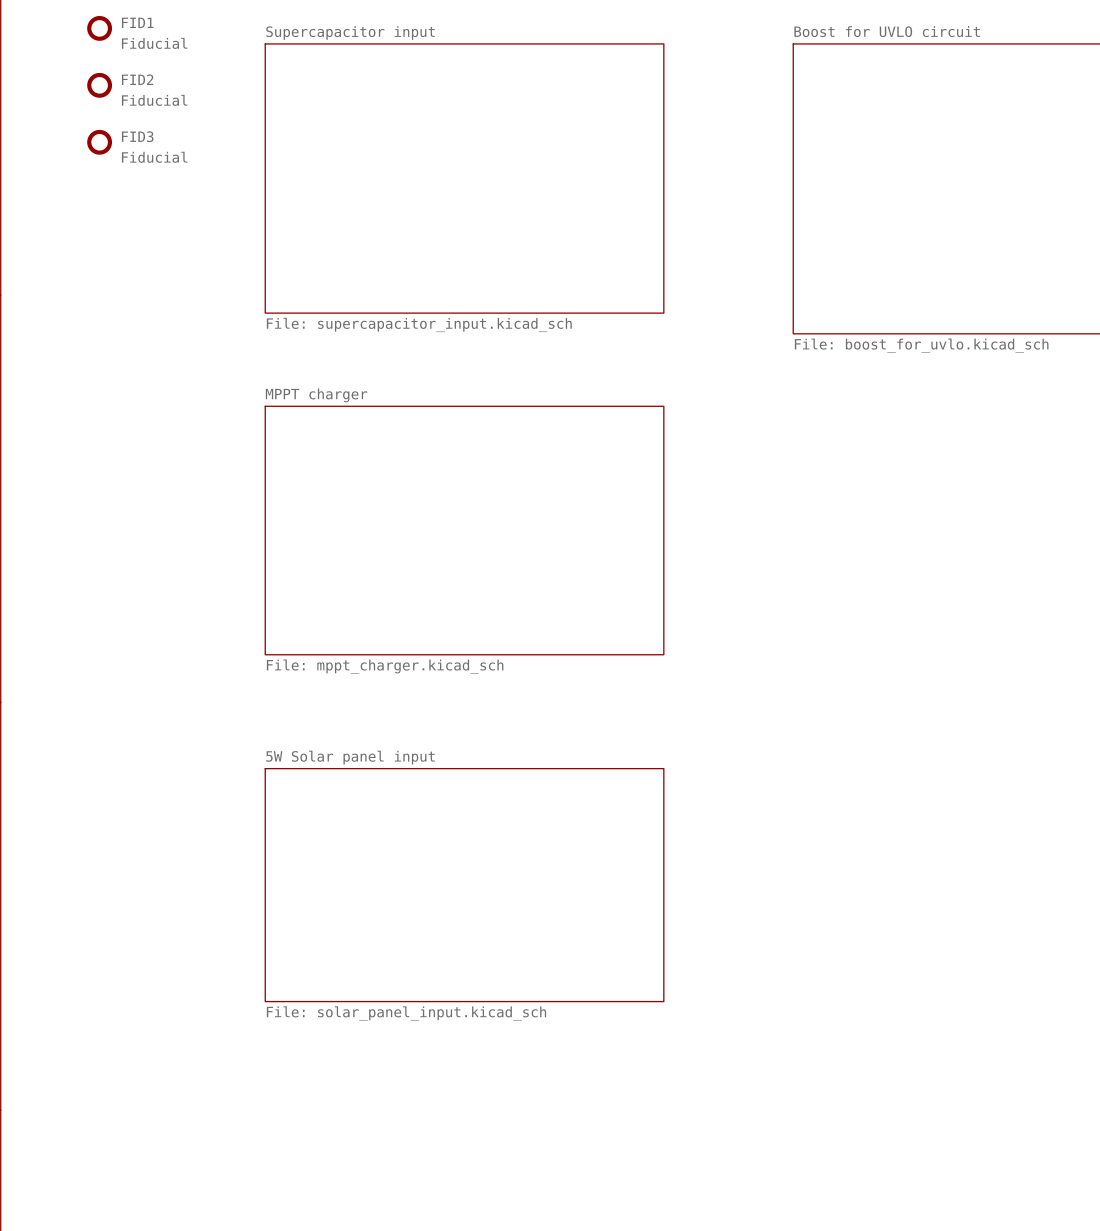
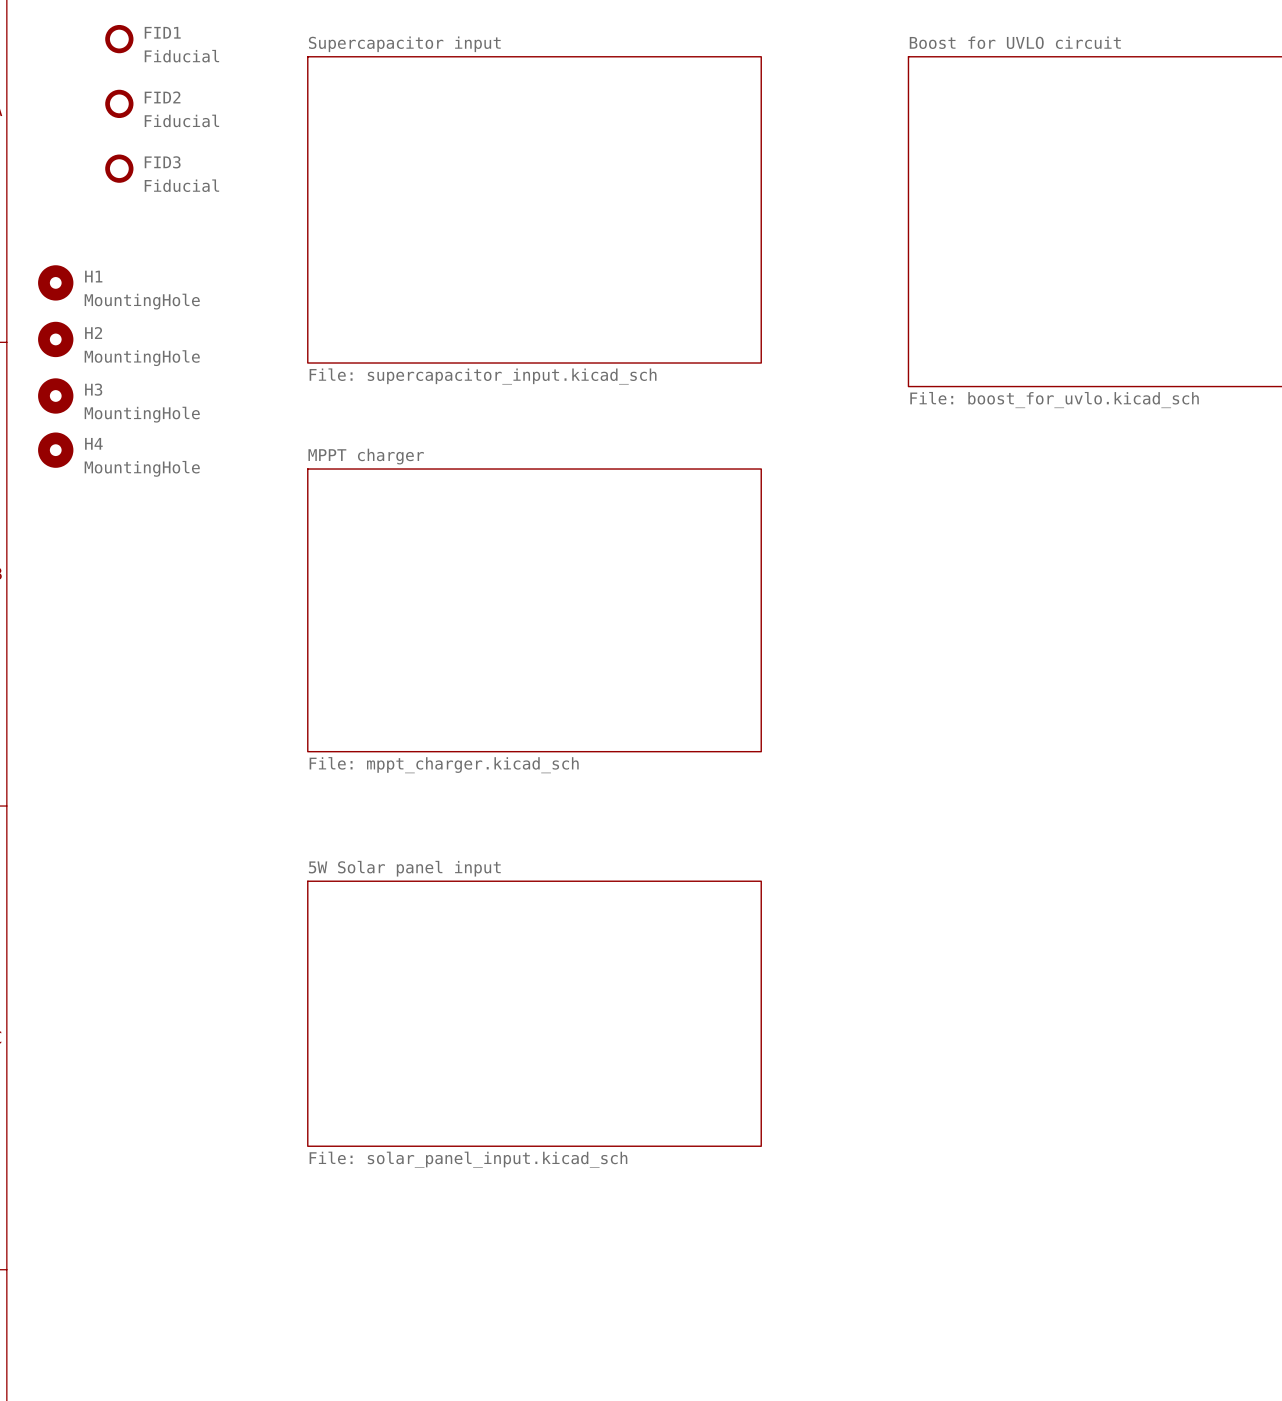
H1: none -> MountingHole (55, 282)
H2: none -> MountingHole (55, 339)
H3: none -> MountingHole (55, 395)
H4: none -> MountingHole (55, 450)

